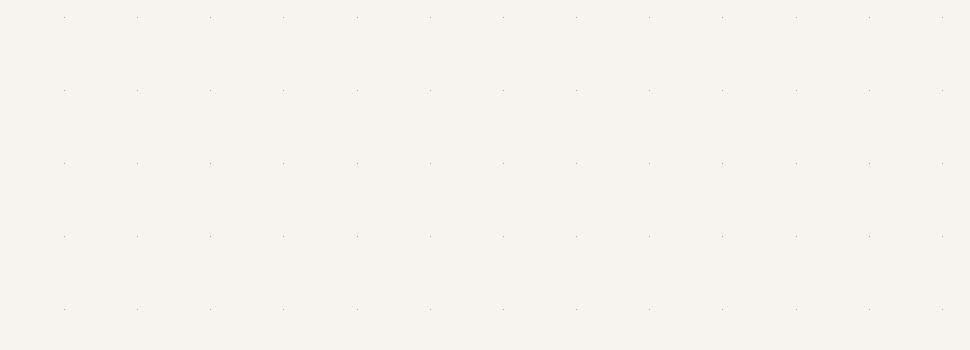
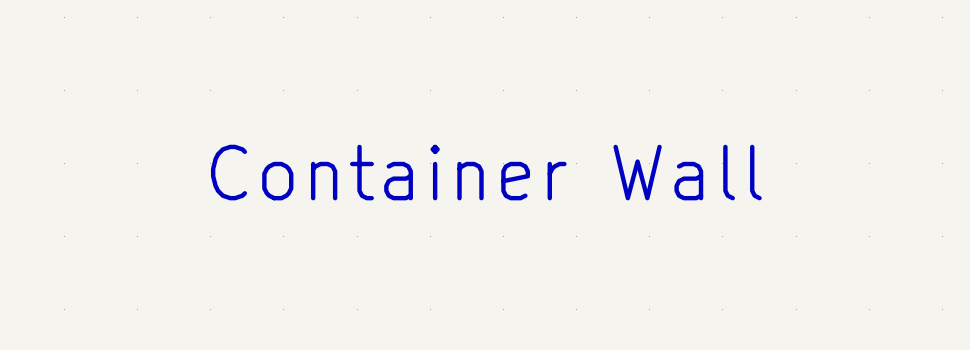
text: none -> Container Wall (486, 172)

